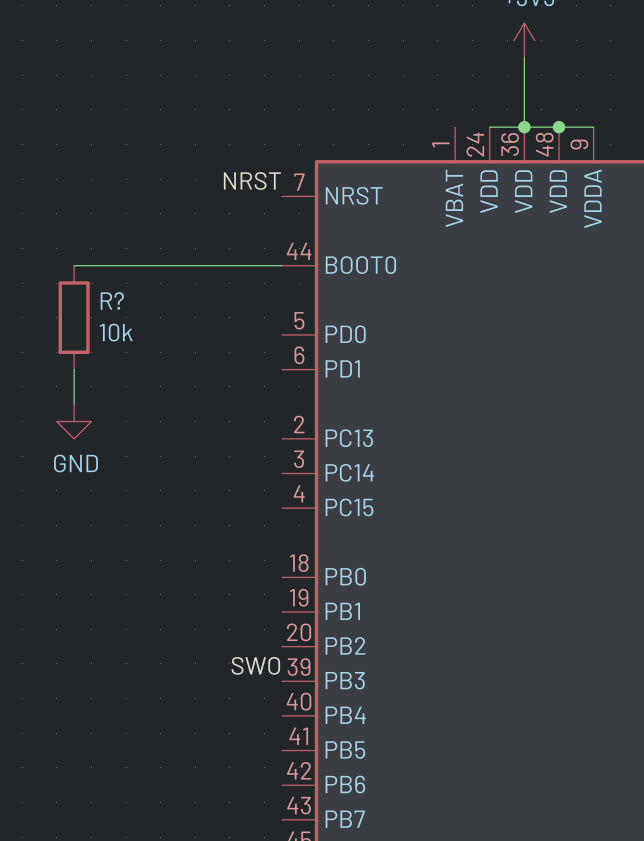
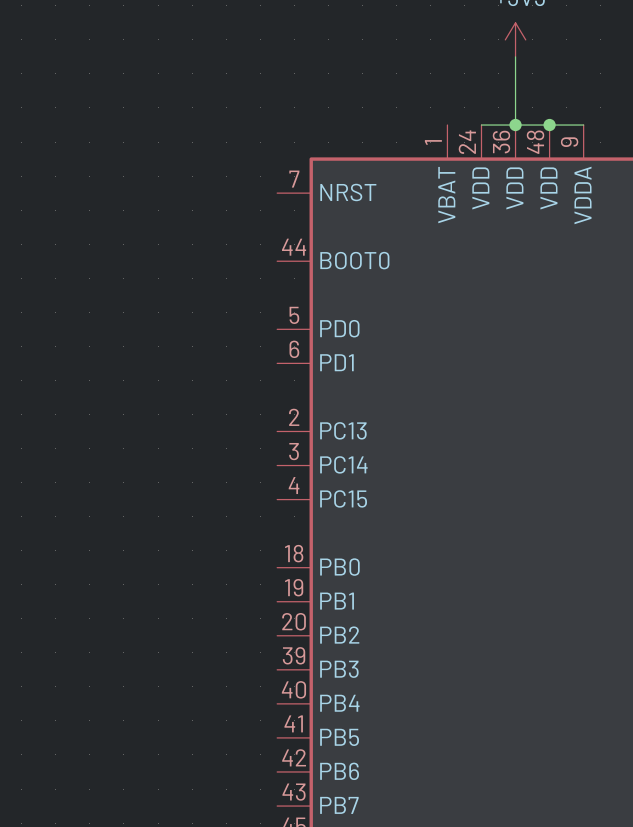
label: NRST (252, 180) -> none
wire: (74, 265) (281, 265) -> none
R?: 10k (74, 317) -> none
wire: (74, 369) (74, 404) -> none
power symbol: GND (74, 421) -> none
label: SWO (255, 665) -> none

